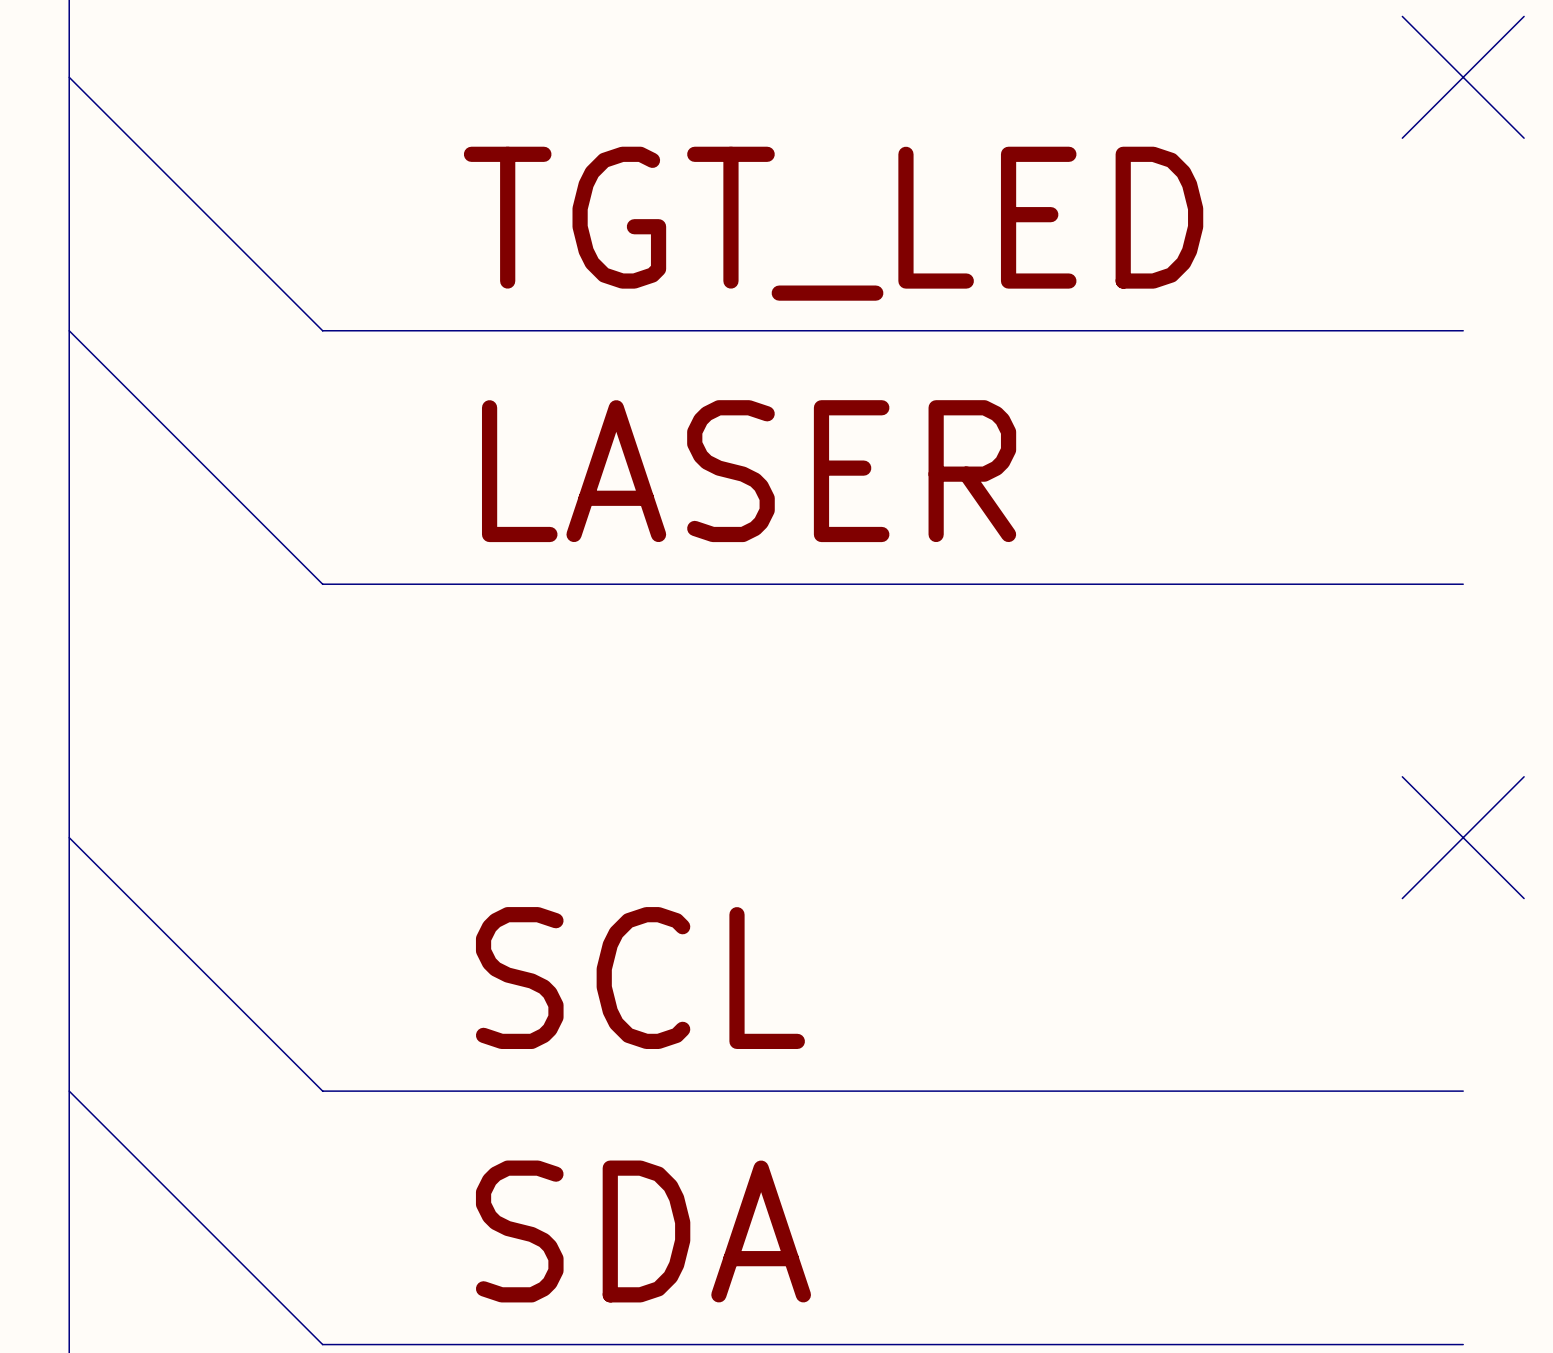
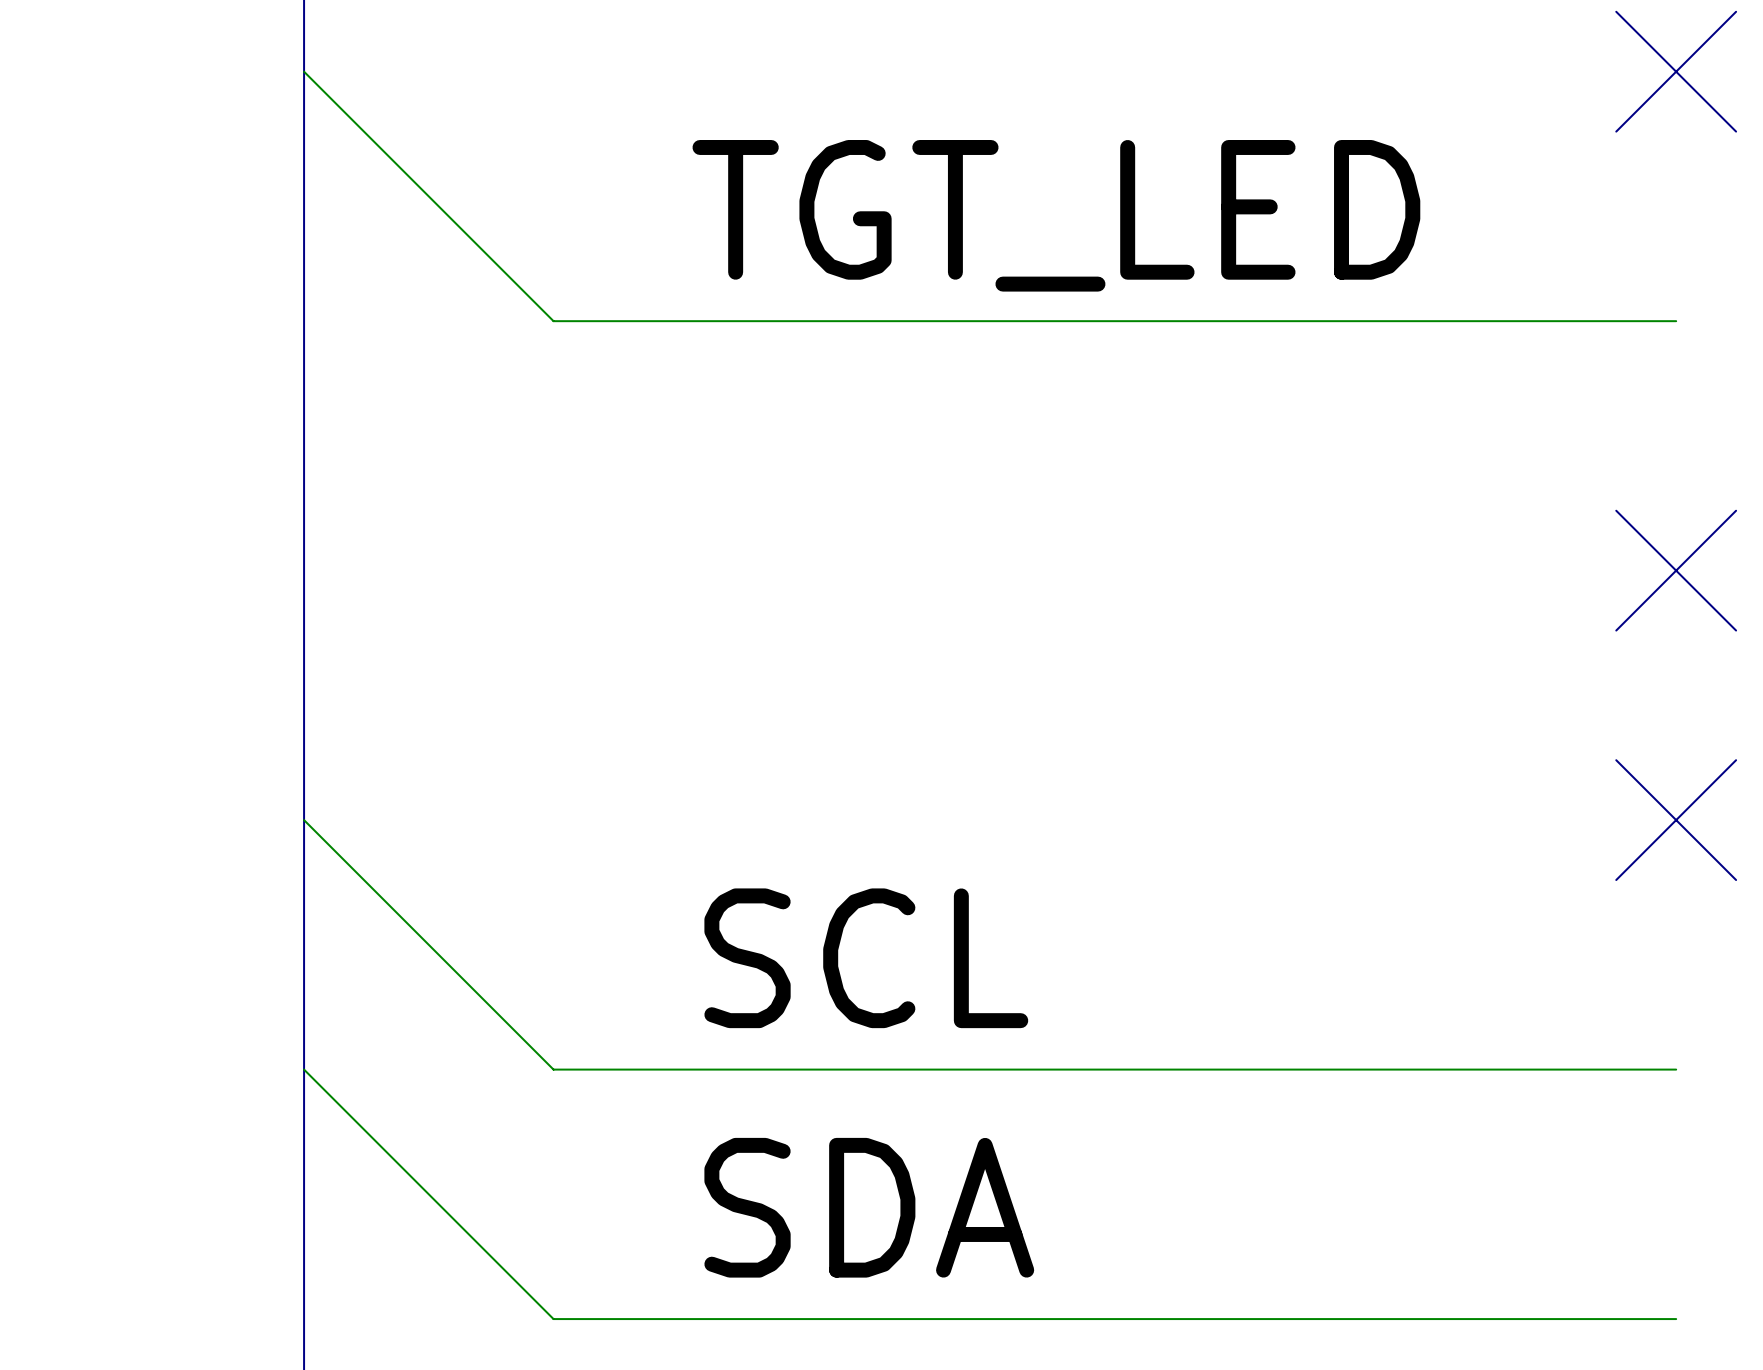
wire: (69, 330) (322, 584) (1463, 584) -> none
label: LASER (749, 471) -> none
no-connect mark: none -> (1676, 570)

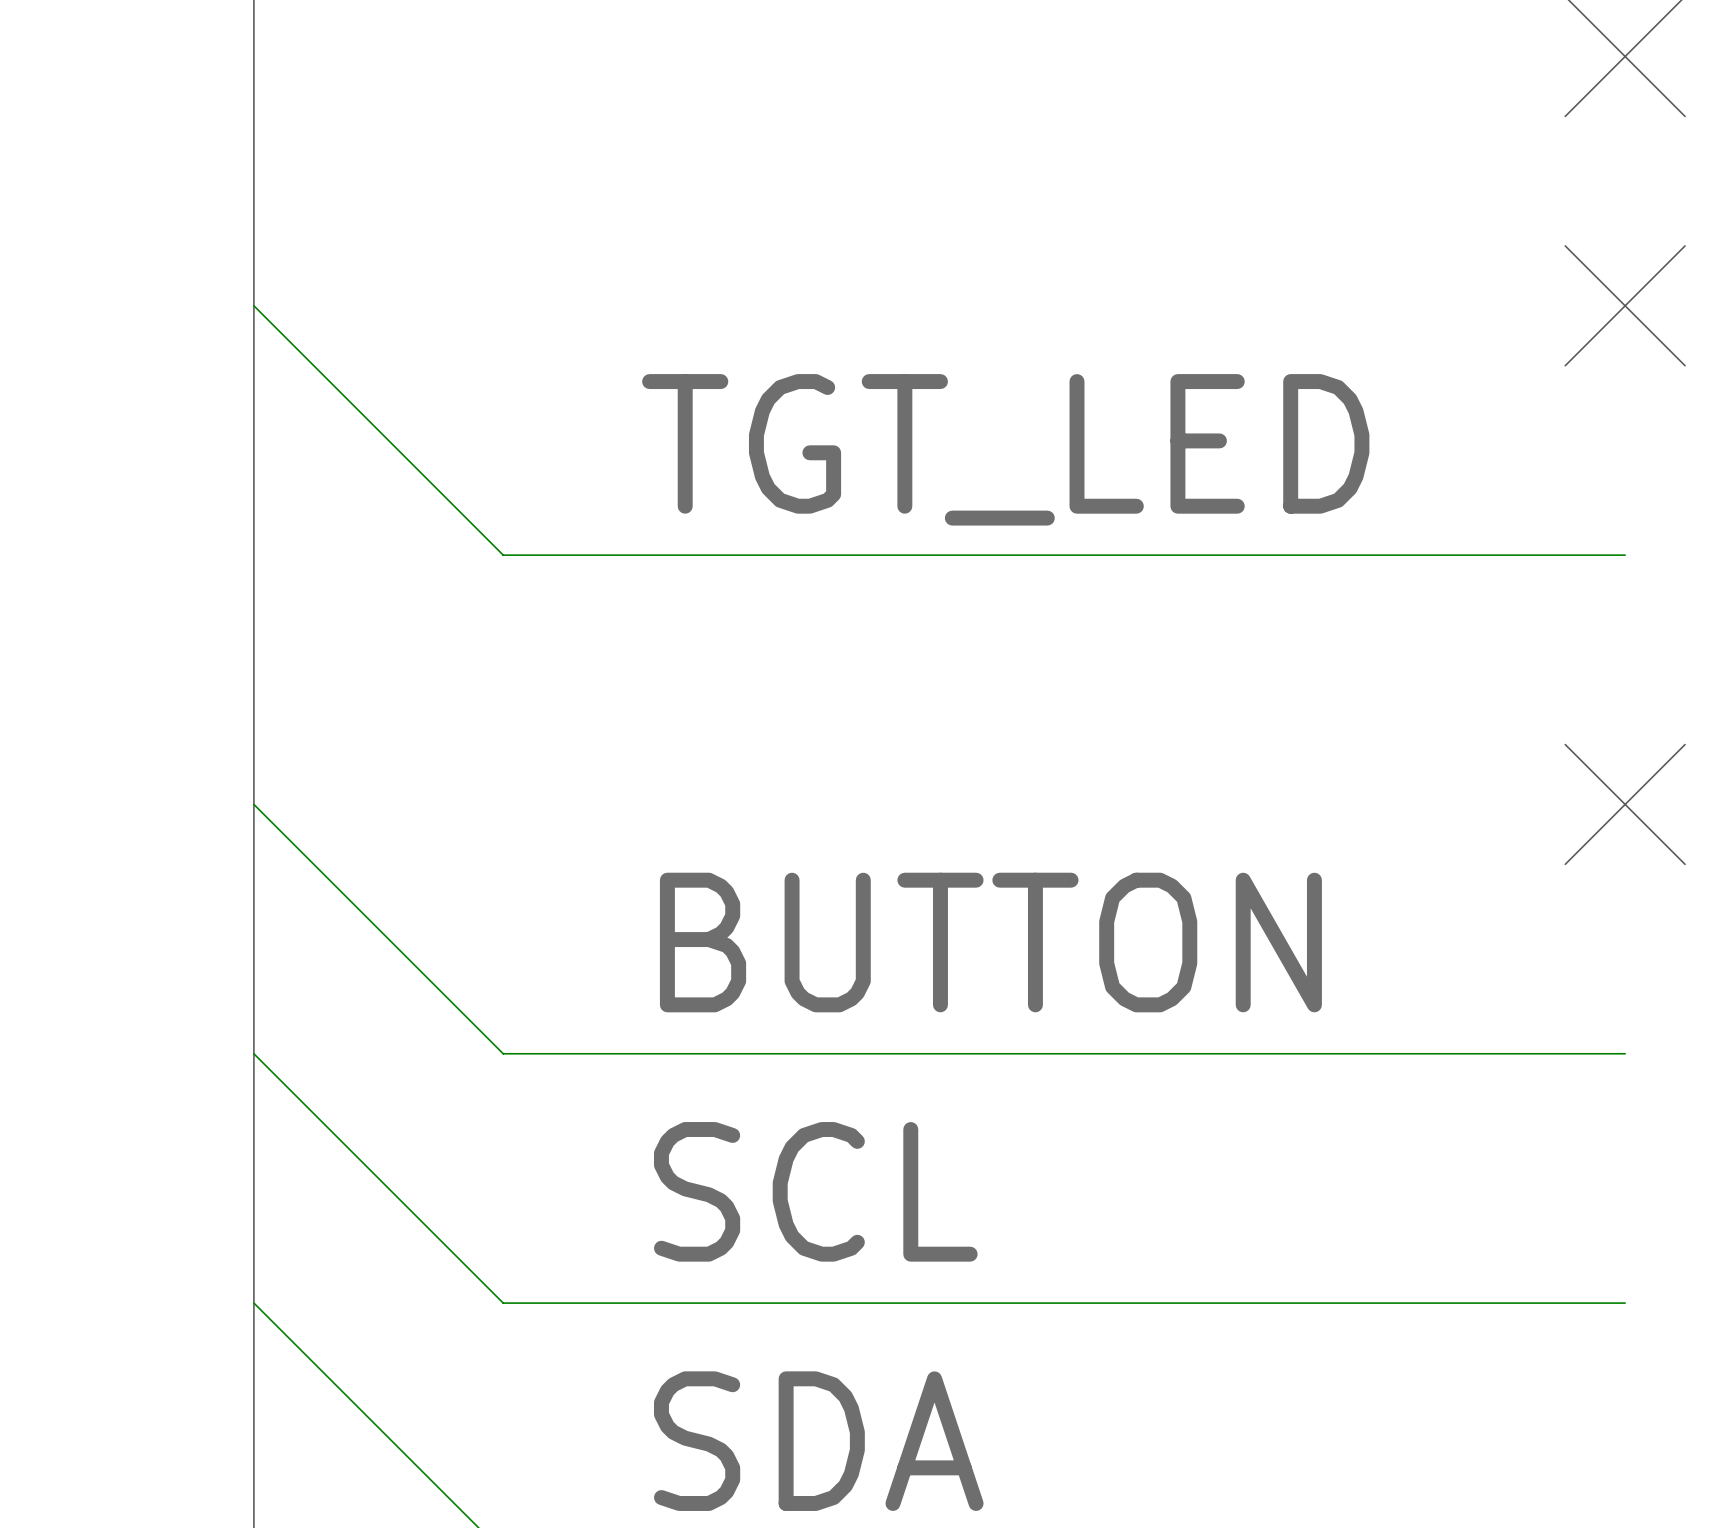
wire: none -> (253, 804) (503, 1053) (1625, 1053)
label: none -> BUTTON (990, 942)
no-connect mark: (1676, 820) -> none

